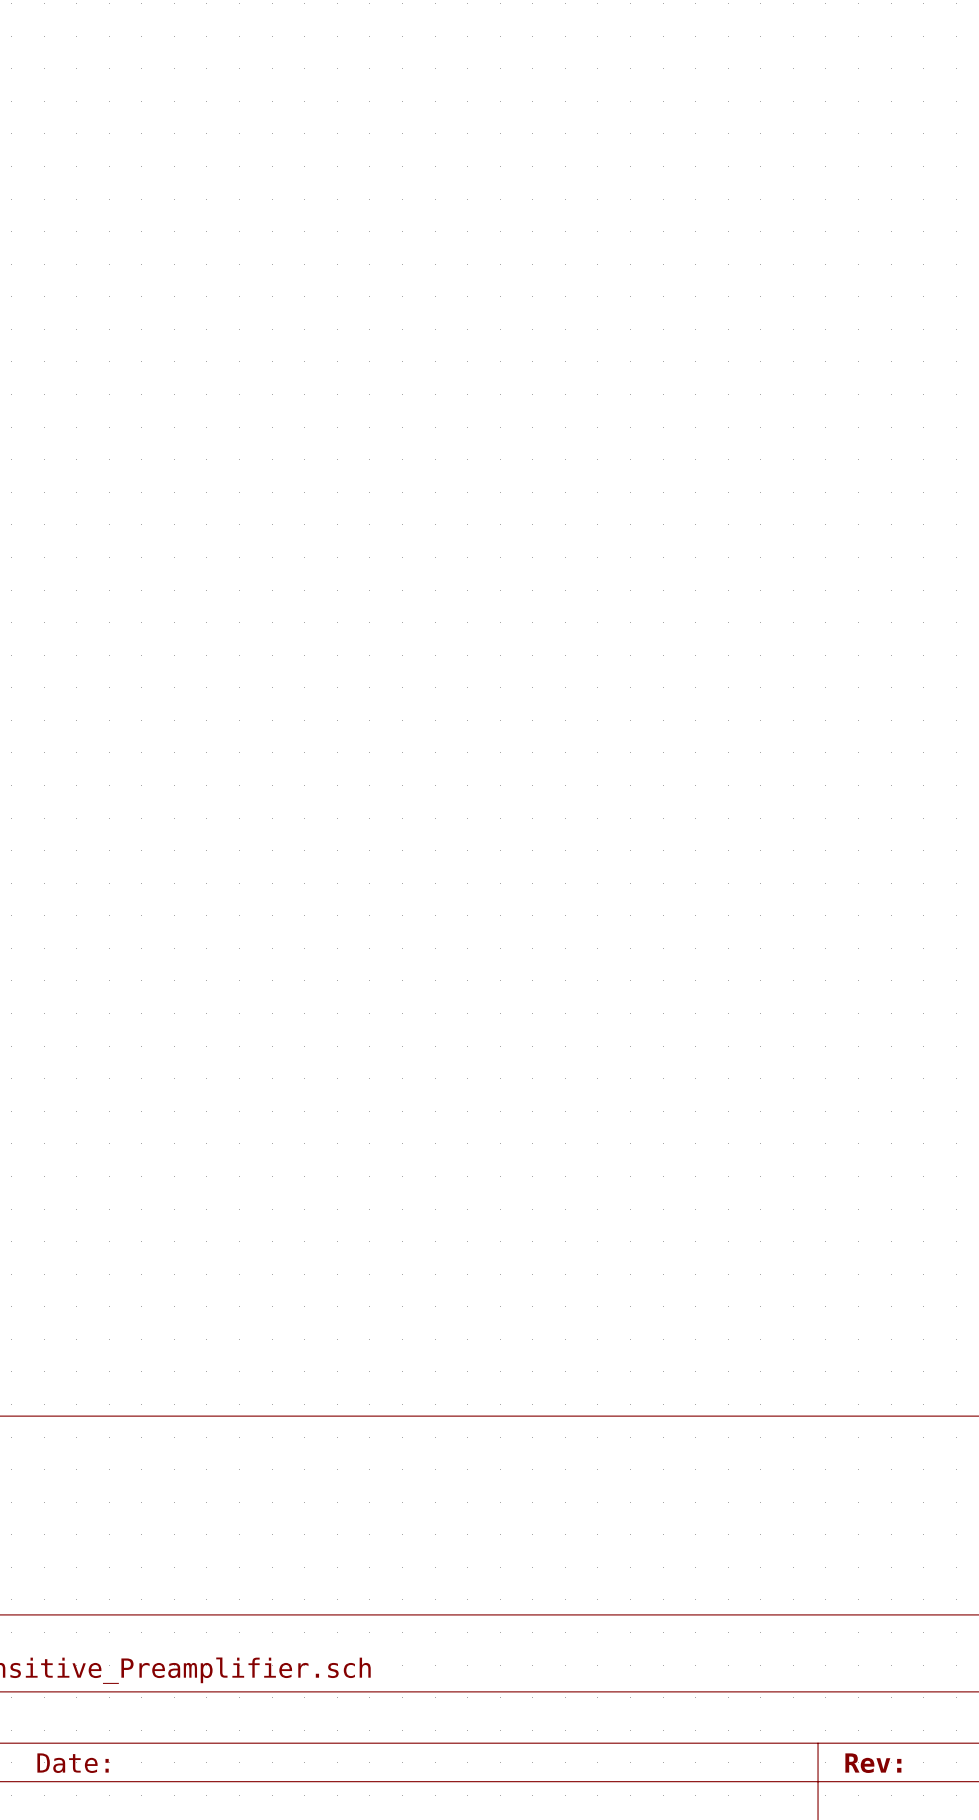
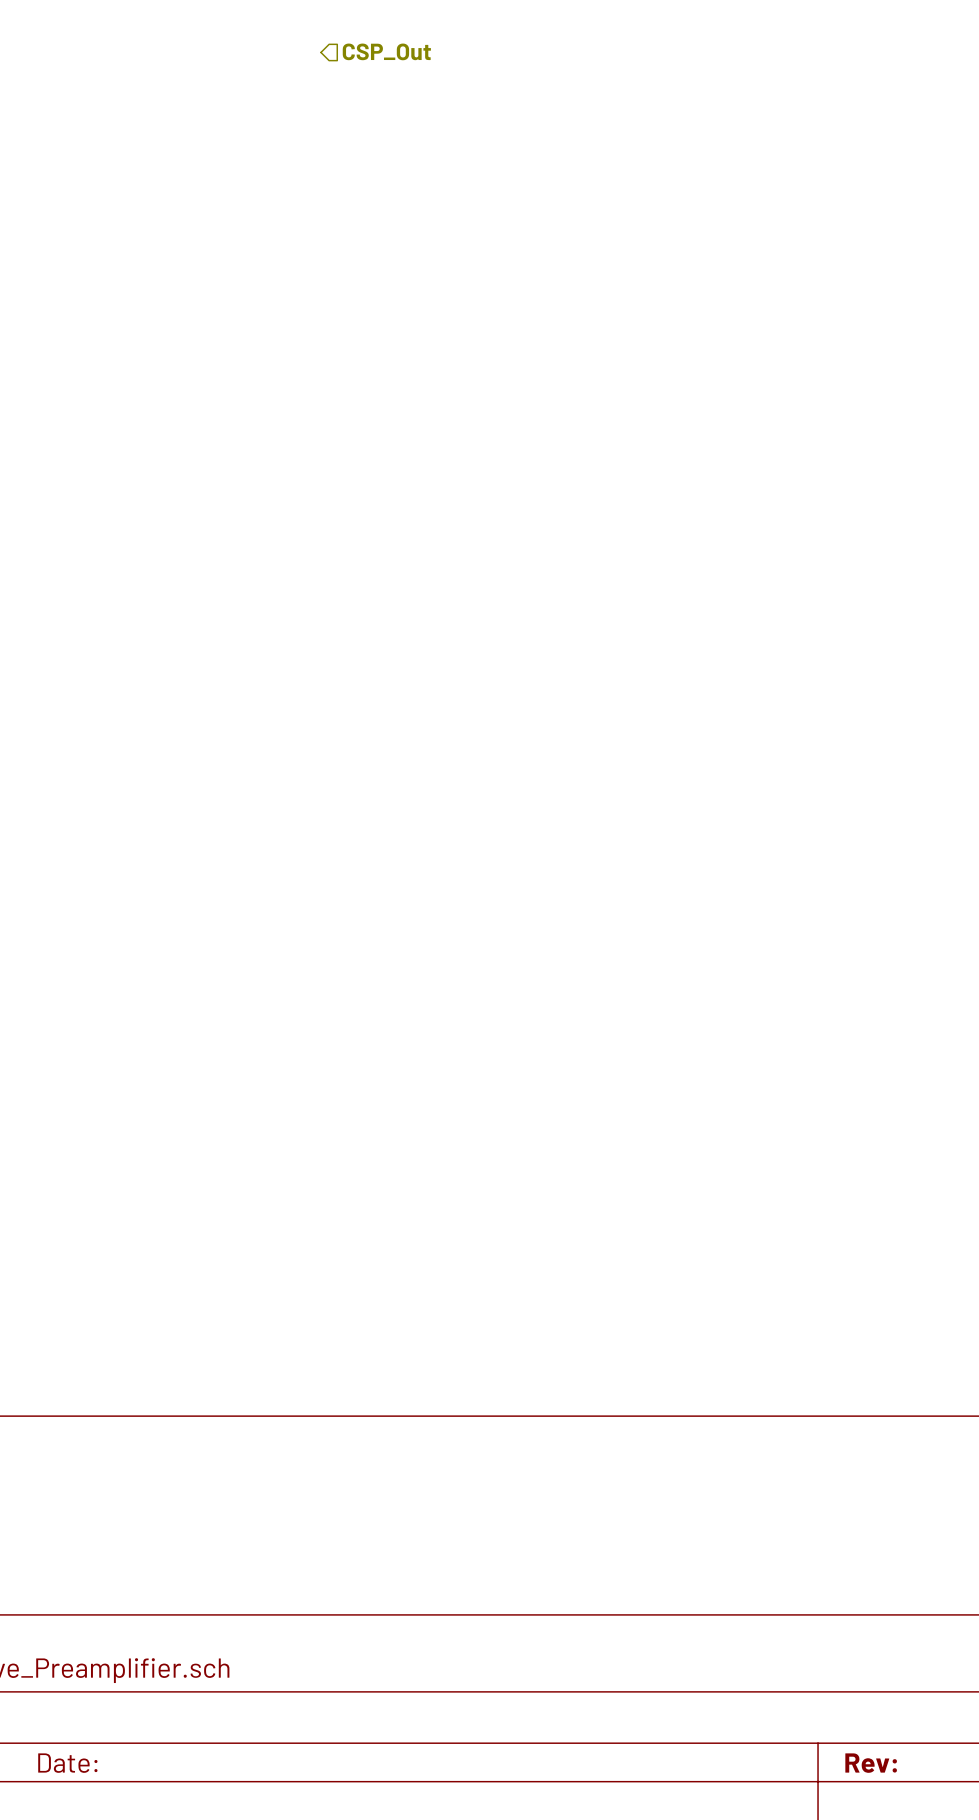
hierarchical label: none -> CSP_Out (386, 51)

